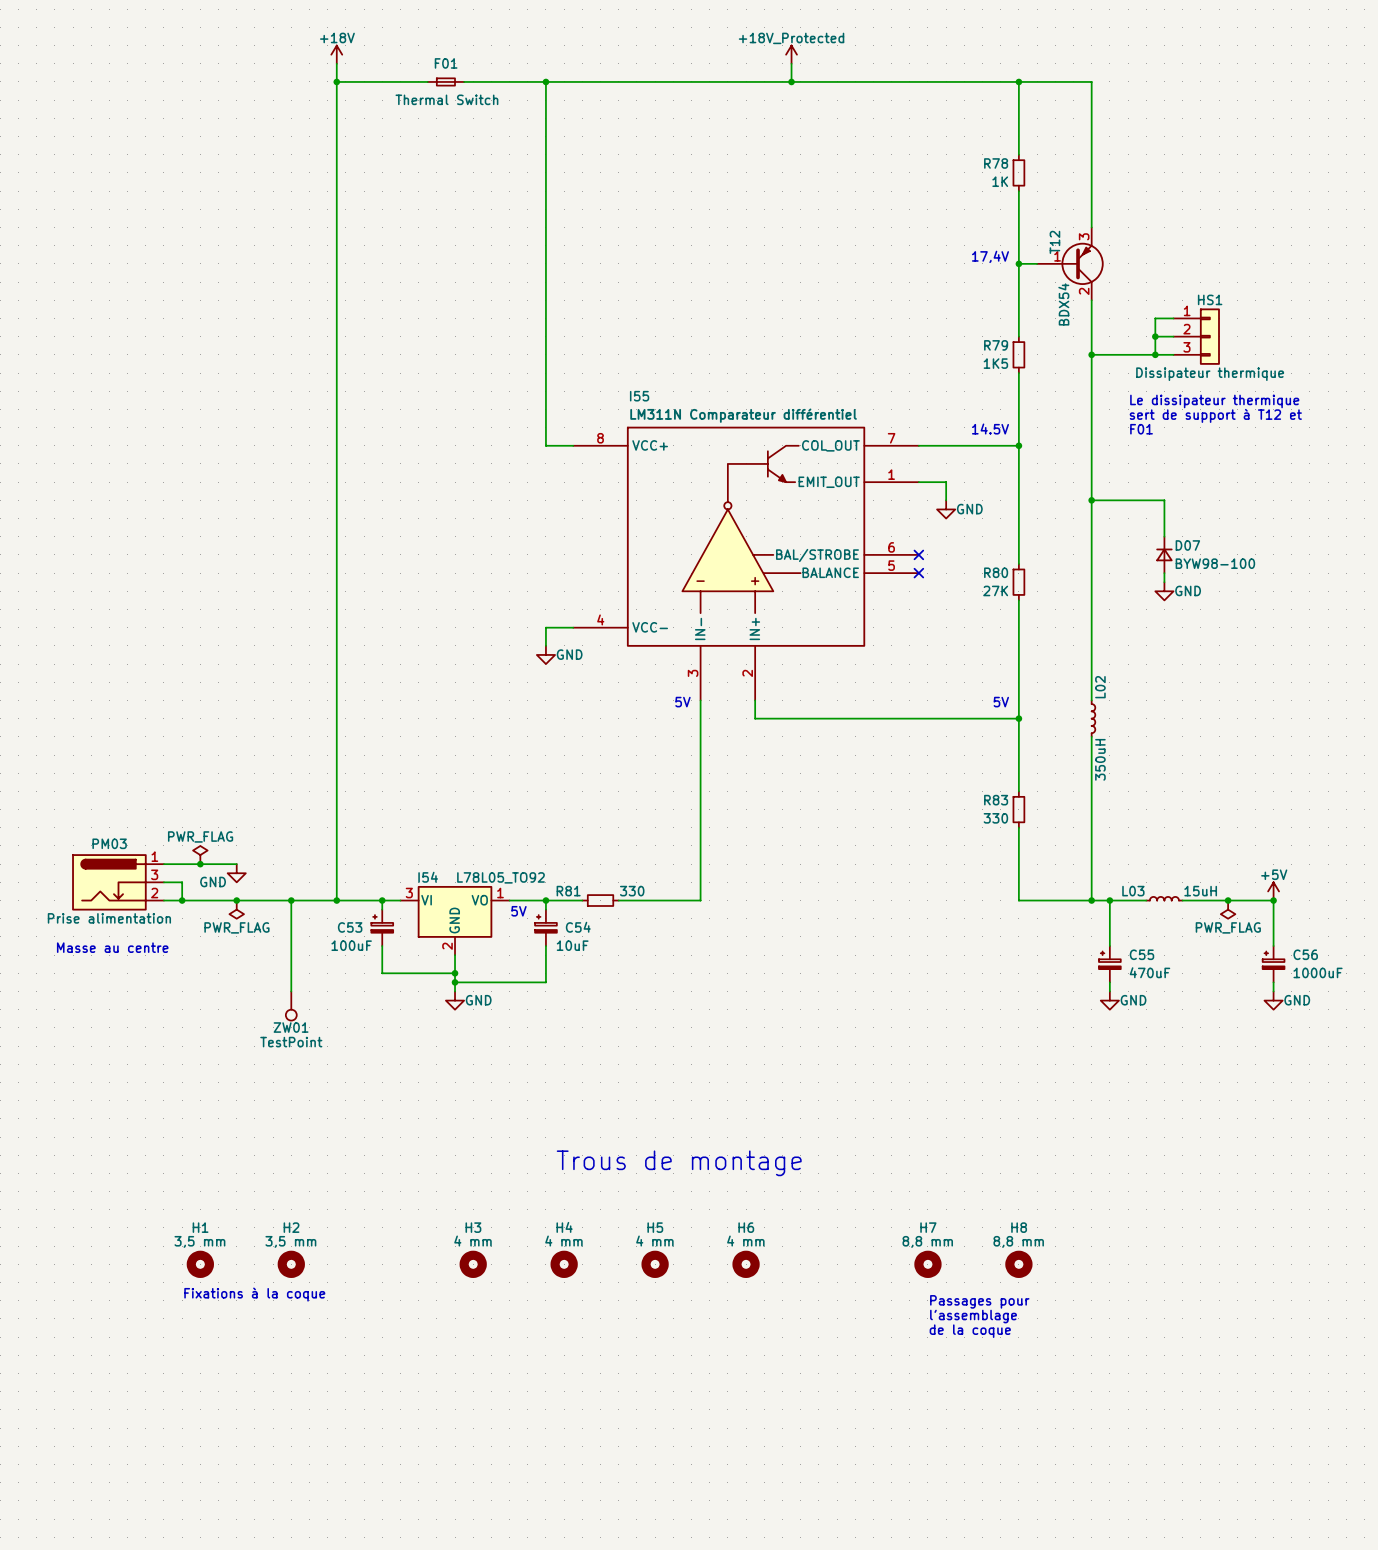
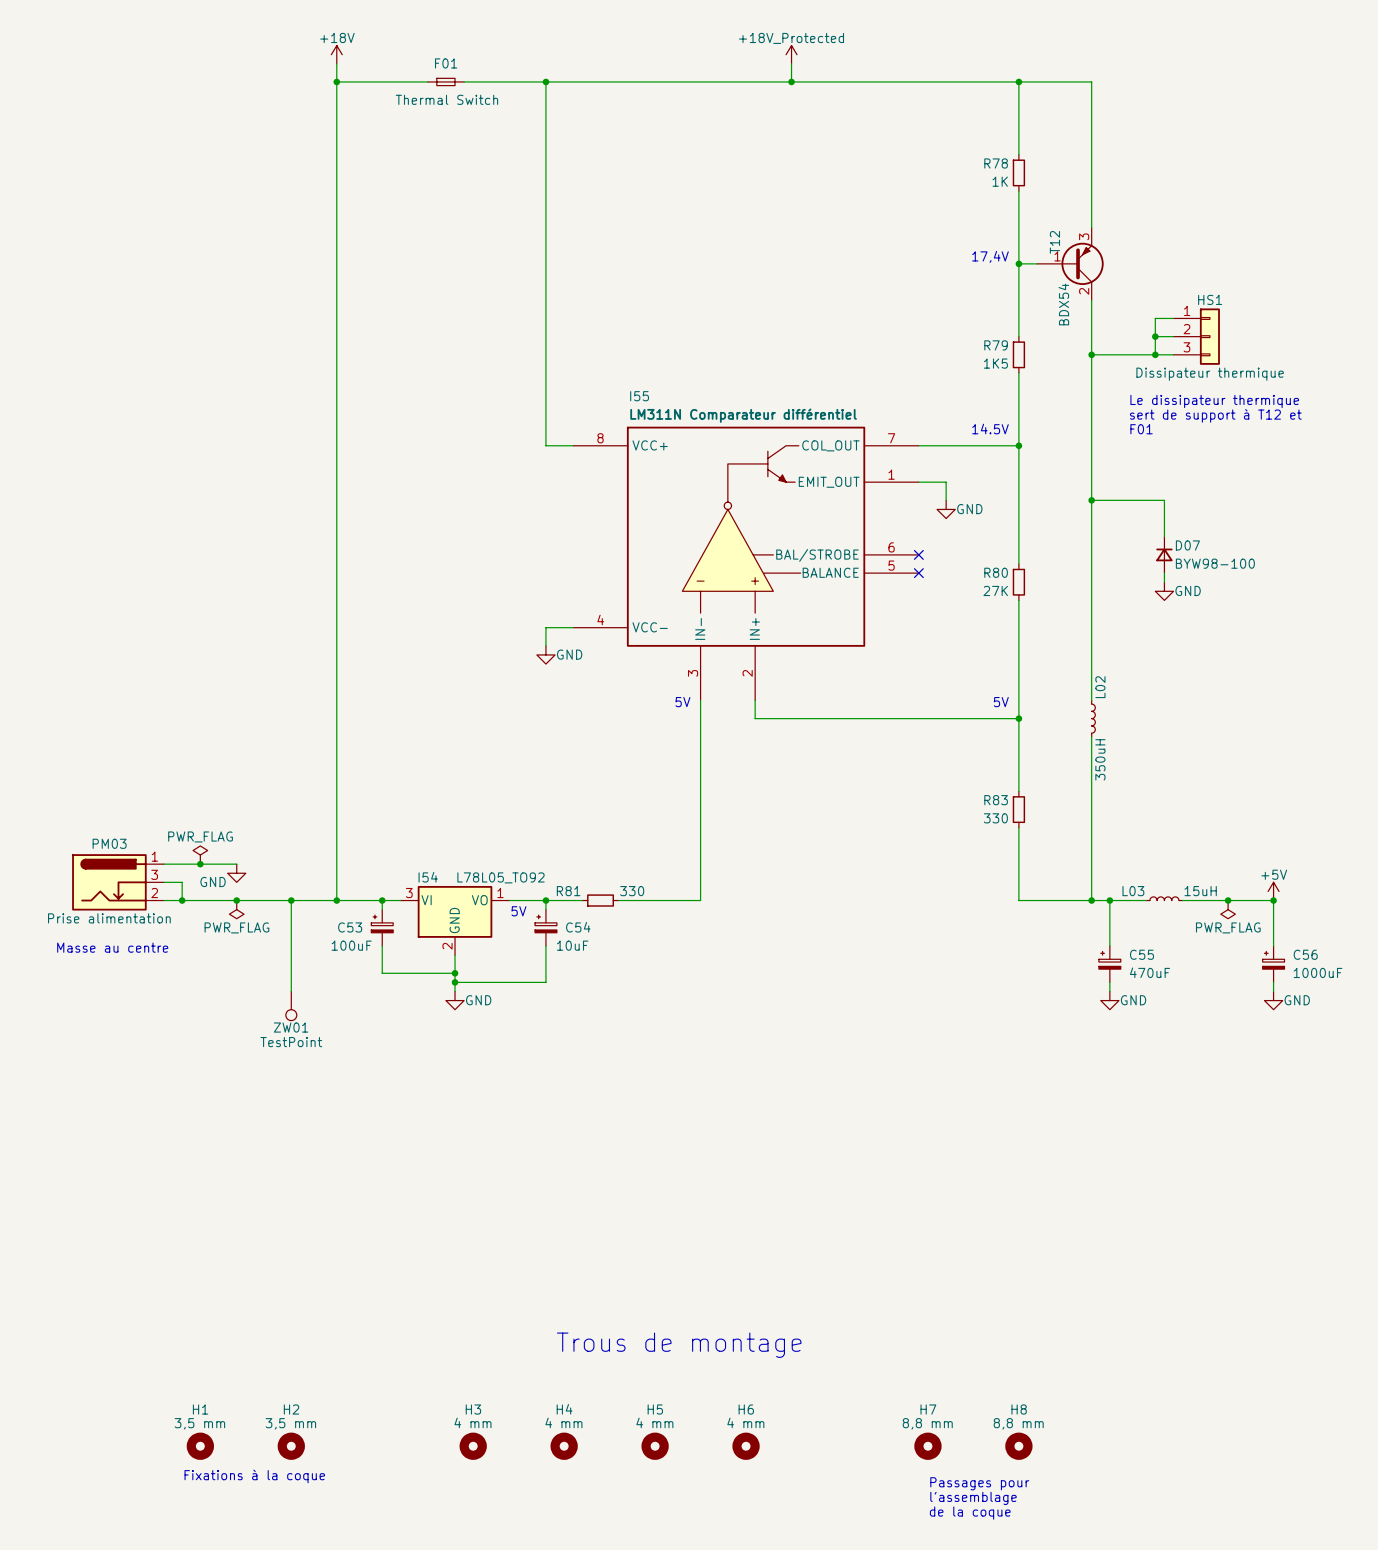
text: Trous de montage (679, 1163) -> none
H1 position: (200, 1264) -> (200, 1446)
H2 position: (291, 1264) -> (291, 1446)
H3 position: (473, 1264) -> (473, 1446)
H4 position: (564, 1264) -> (564, 1446)
H5 position: (655, 1264) -> (655, 1446)
H6 position: (746, 1264) -> (746, 1446)
H7 position: (927, 1264) -> (927, 1446)
H8 position: (1018, 1264) -> (1018, 1446)
text: Fixations à la coque (254, 1294) -> none
text: Passages pour (979, 1301) -> none
text: l'assemblage (973, 1316) -> none
text: de la coque (970, 1331) -> none
text: none -> Trous de montage (679, 1345)
text: none -> Fixations à la coque (254, 1476)
text: none -> Passages pour (979, 1483)
text: none -> l'assemblage (973, 1498)
text: none -> de la coque (970, 1513)

